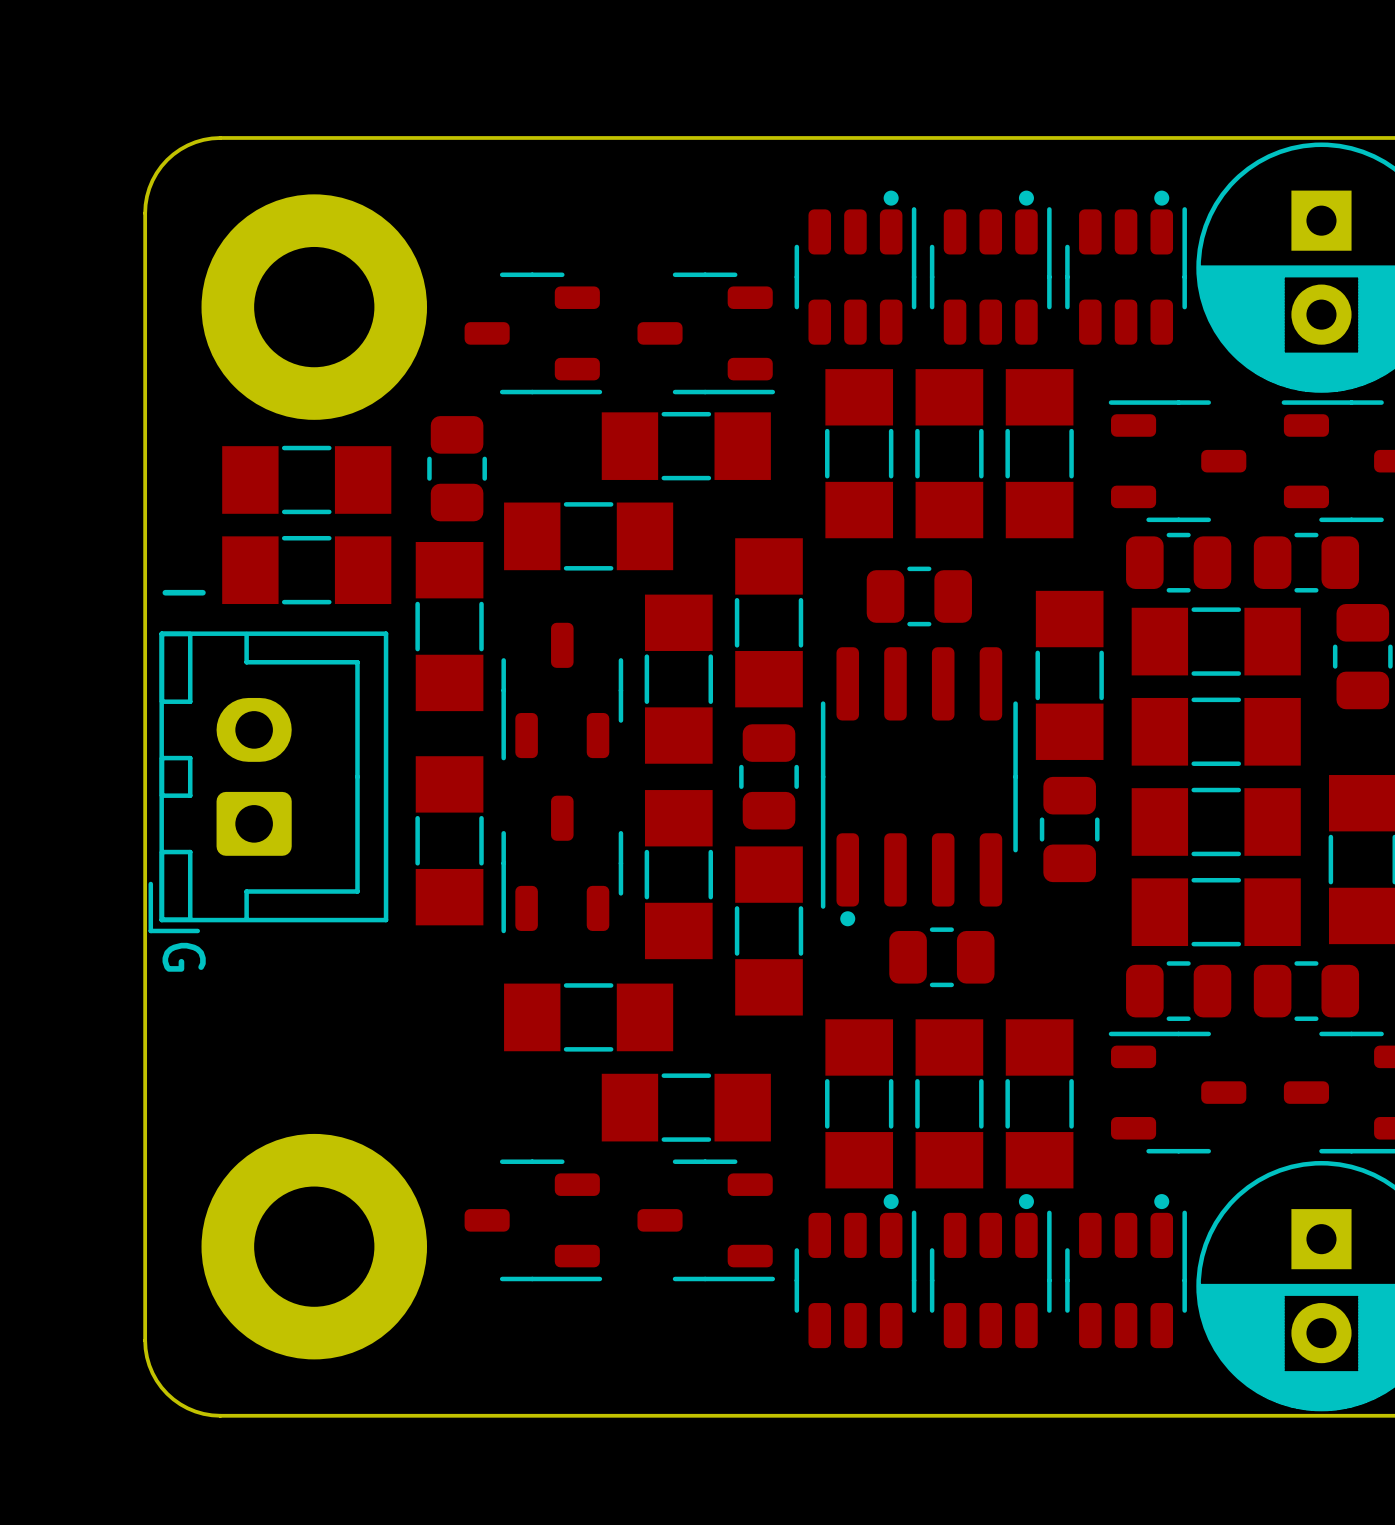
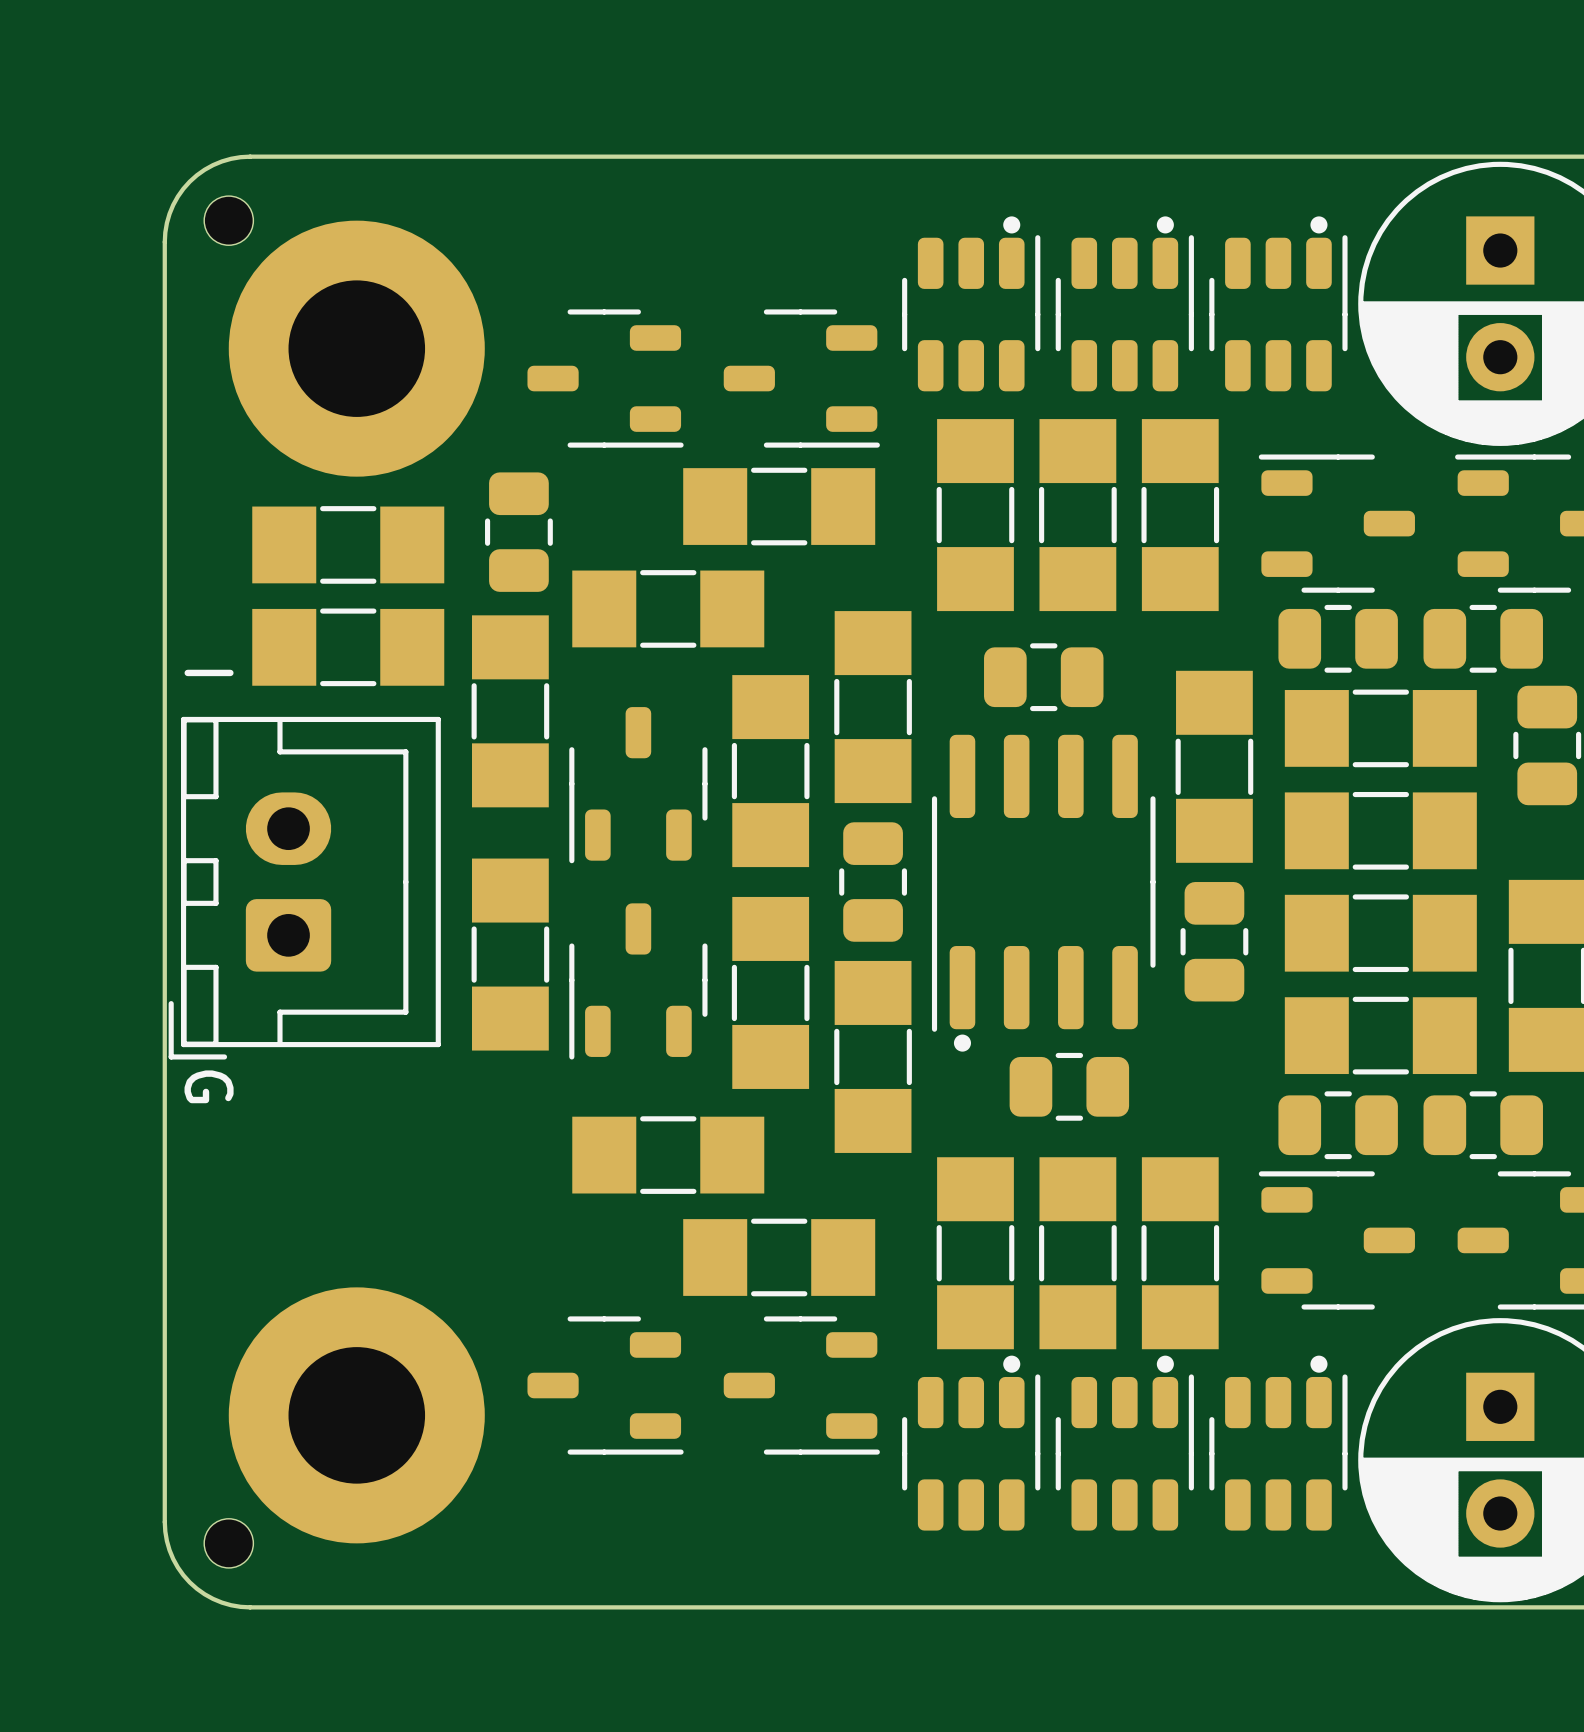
part: none -> (228, 220)
part: none -> (228, 1543)

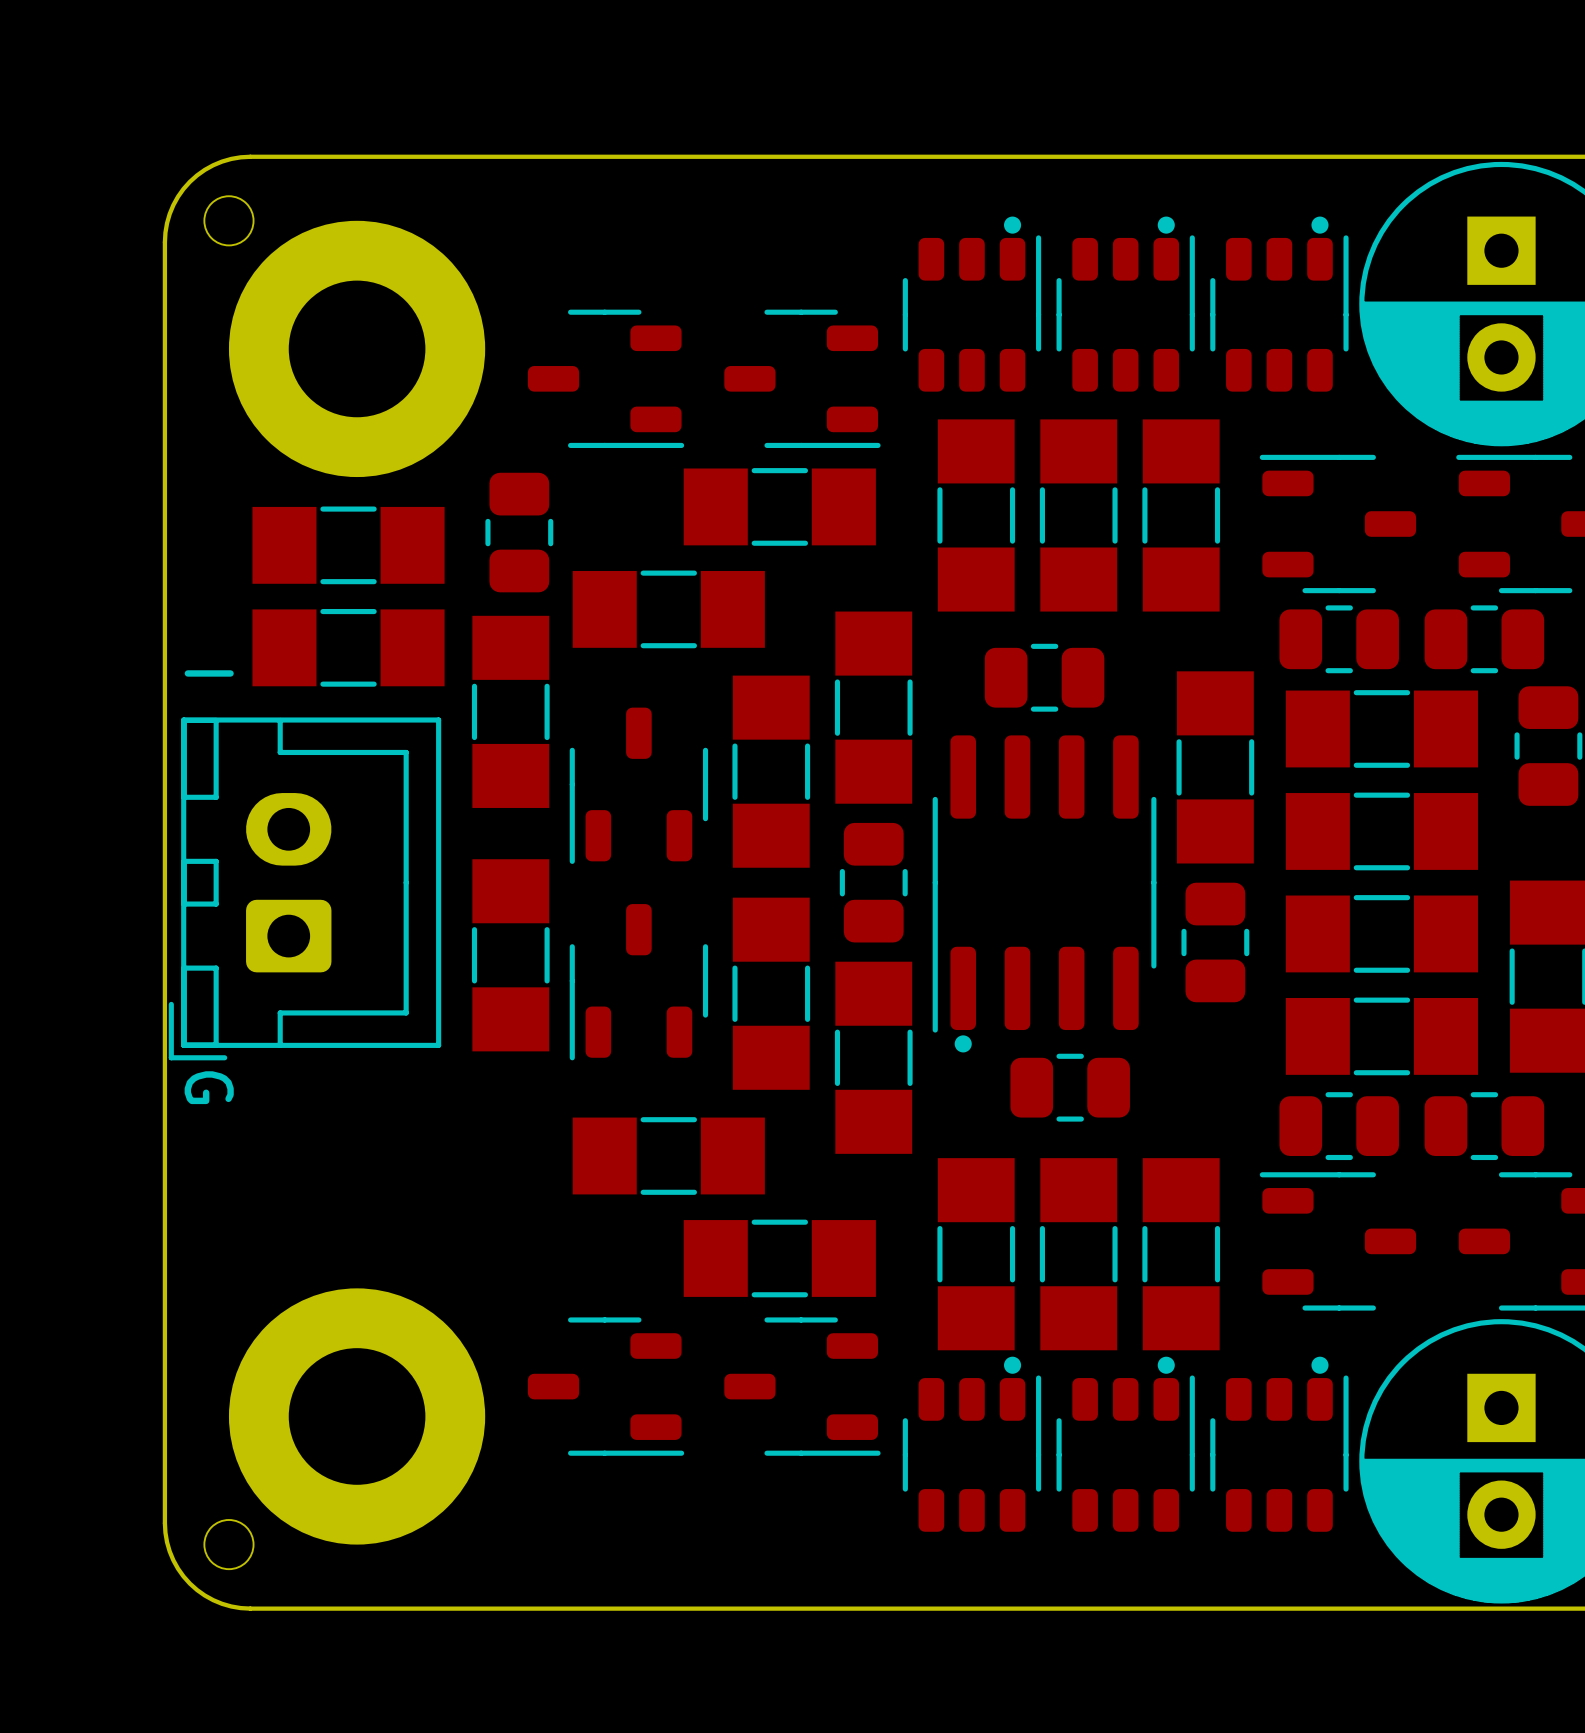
part footprint: [902, 216, 1041, 392] -> [902, 216, 1042, 392]
part footprint: [1055, 216, 1194, 392] -> [1056, 216, 1195, 392]
part footprint: [1209, 216, 1348, 392] -> [1210, 216, 1349, 392]
part footprint: [902, 1355, 1041, 1531] -> [902, 1356, 1042, 1532]
part footprint: [1055, 1355, 1194, 1531] -> [1056, 1356, 1195, 1532]
part footprint: [1209, 1355, 1348, 1531] -> [1210, 1356, 1349, 1532]

